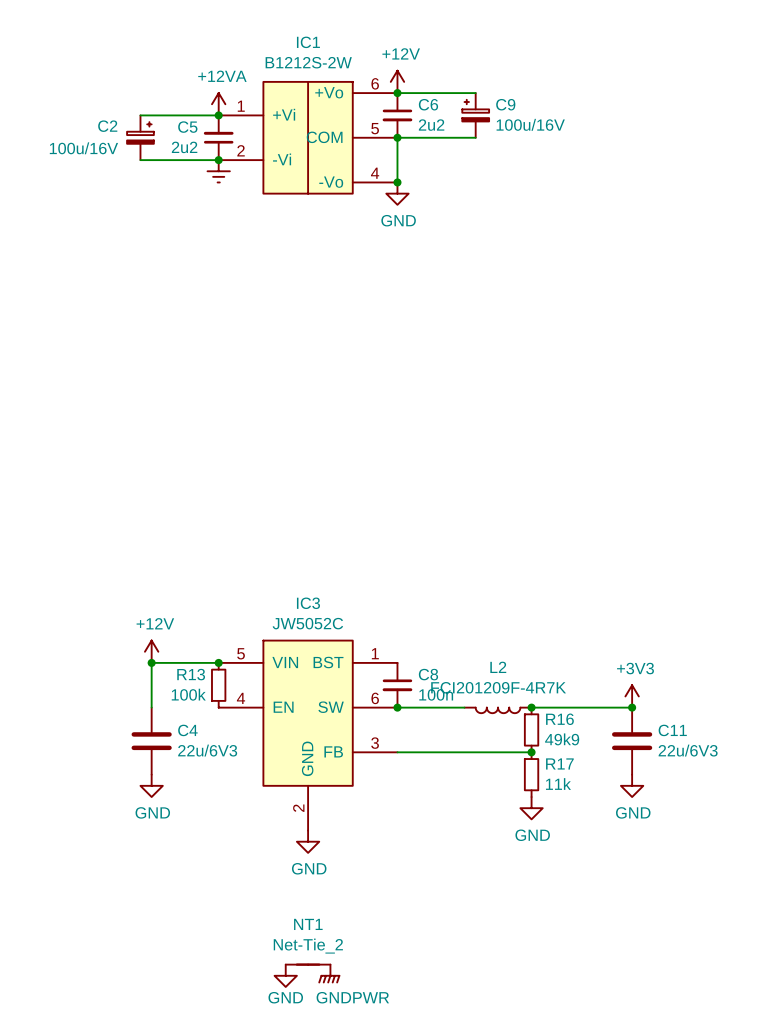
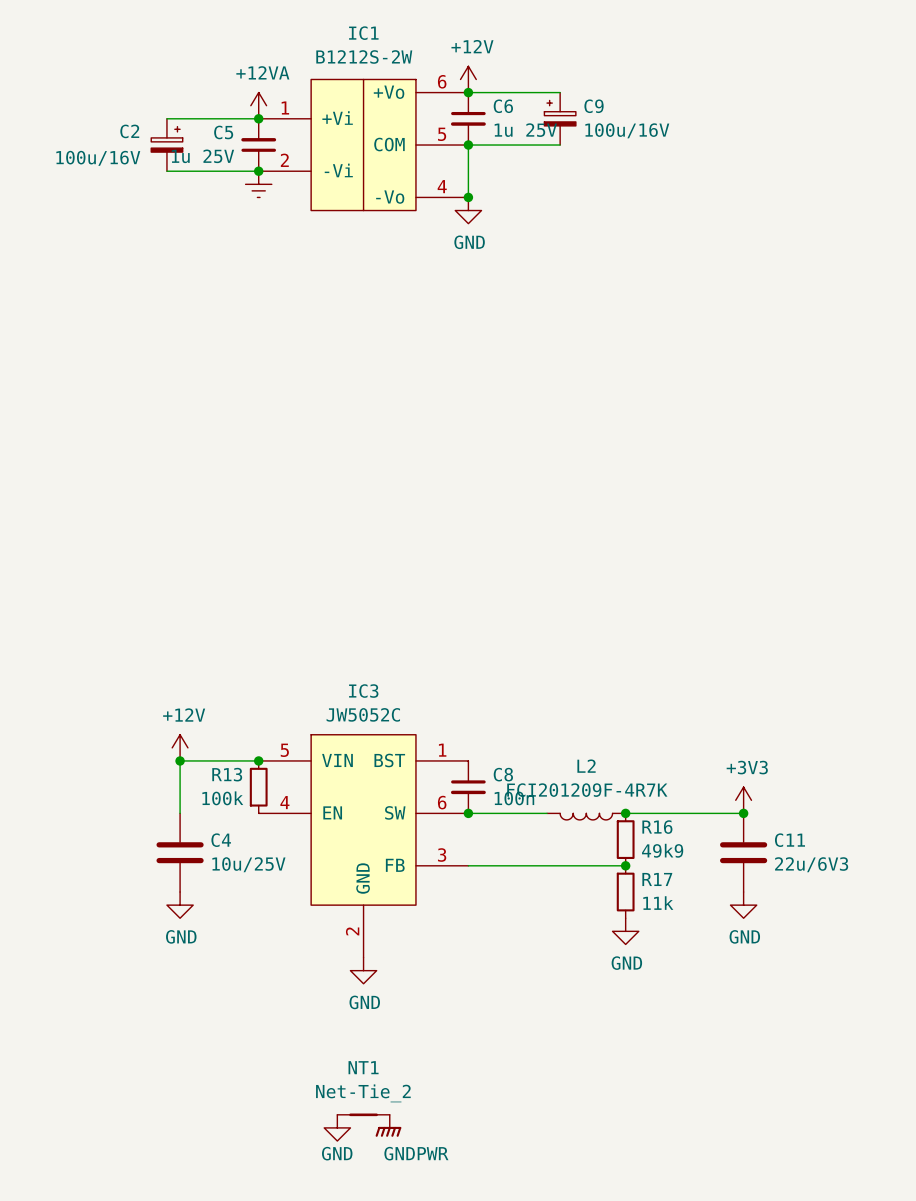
C6 value: 2u2 (431, 125) -> 1u 25V (525, 130)
C5 value: 2u2 (184, 147) -> 1u 25V (202, 156)
C4 value: 22u/6V3 (207, 750) -> 10u/25V (248, 864)

